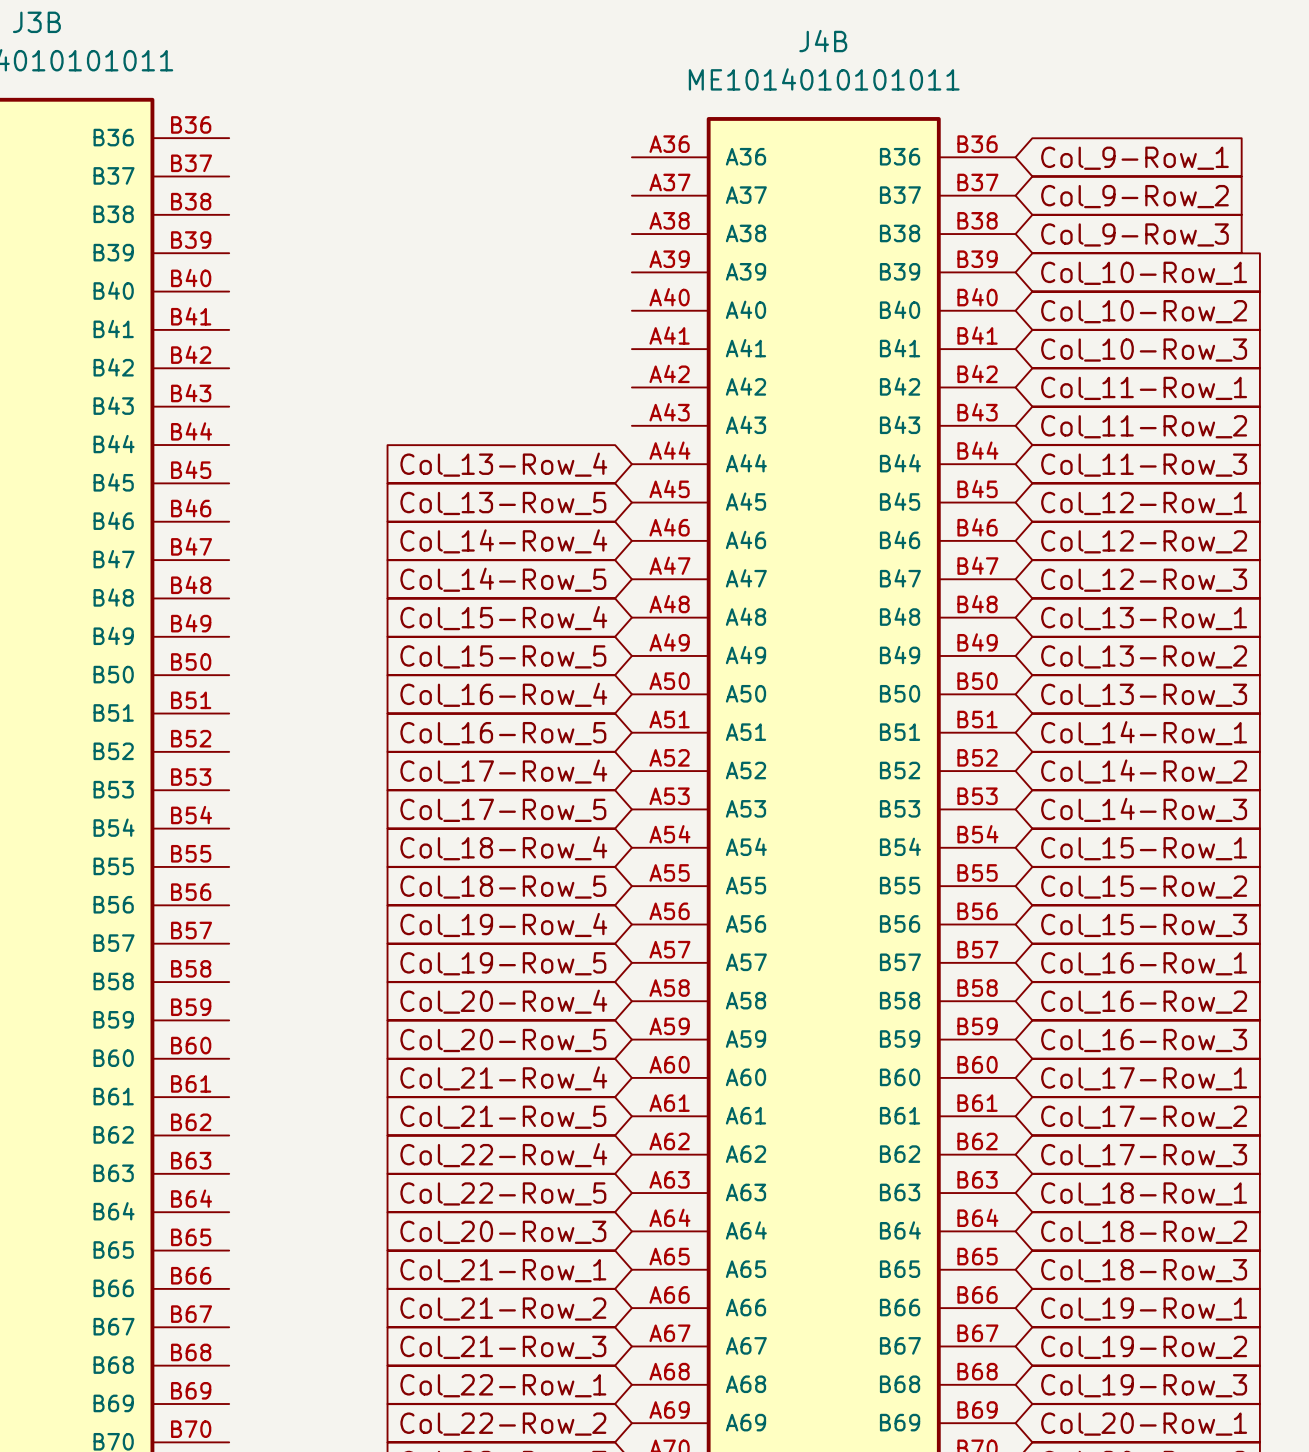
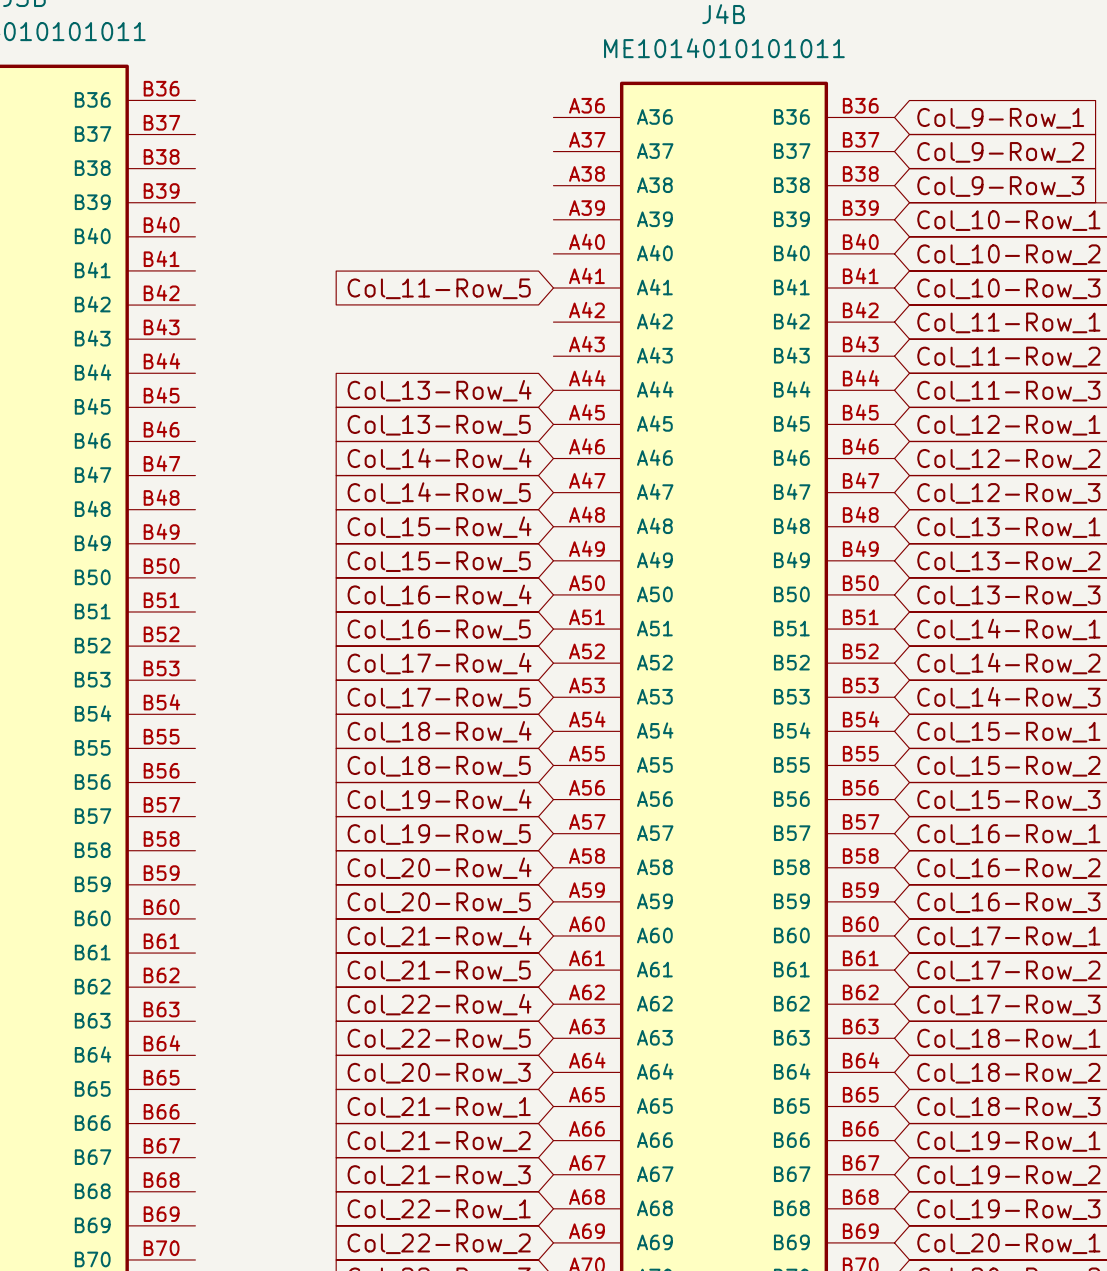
global label: none -> Col_11-Row_5 (439, 288)

